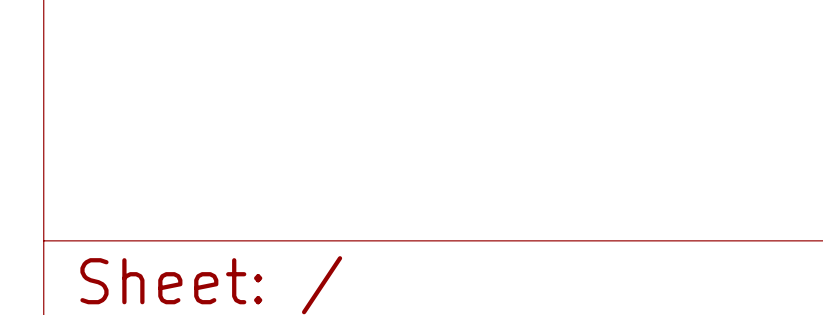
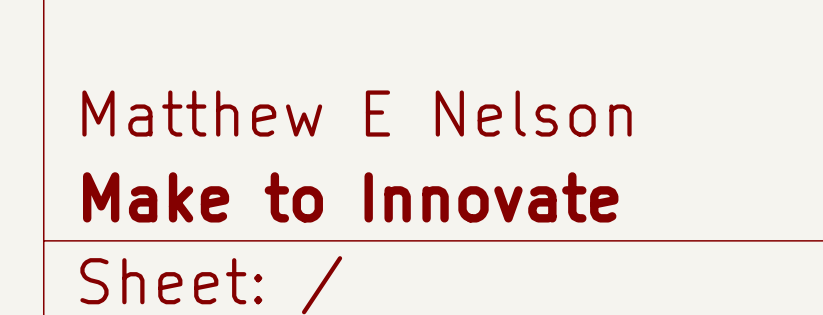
title block: none -> Matthew E Nelson (356, 113)
title block: none -> Make to Innovate (350, 197)

